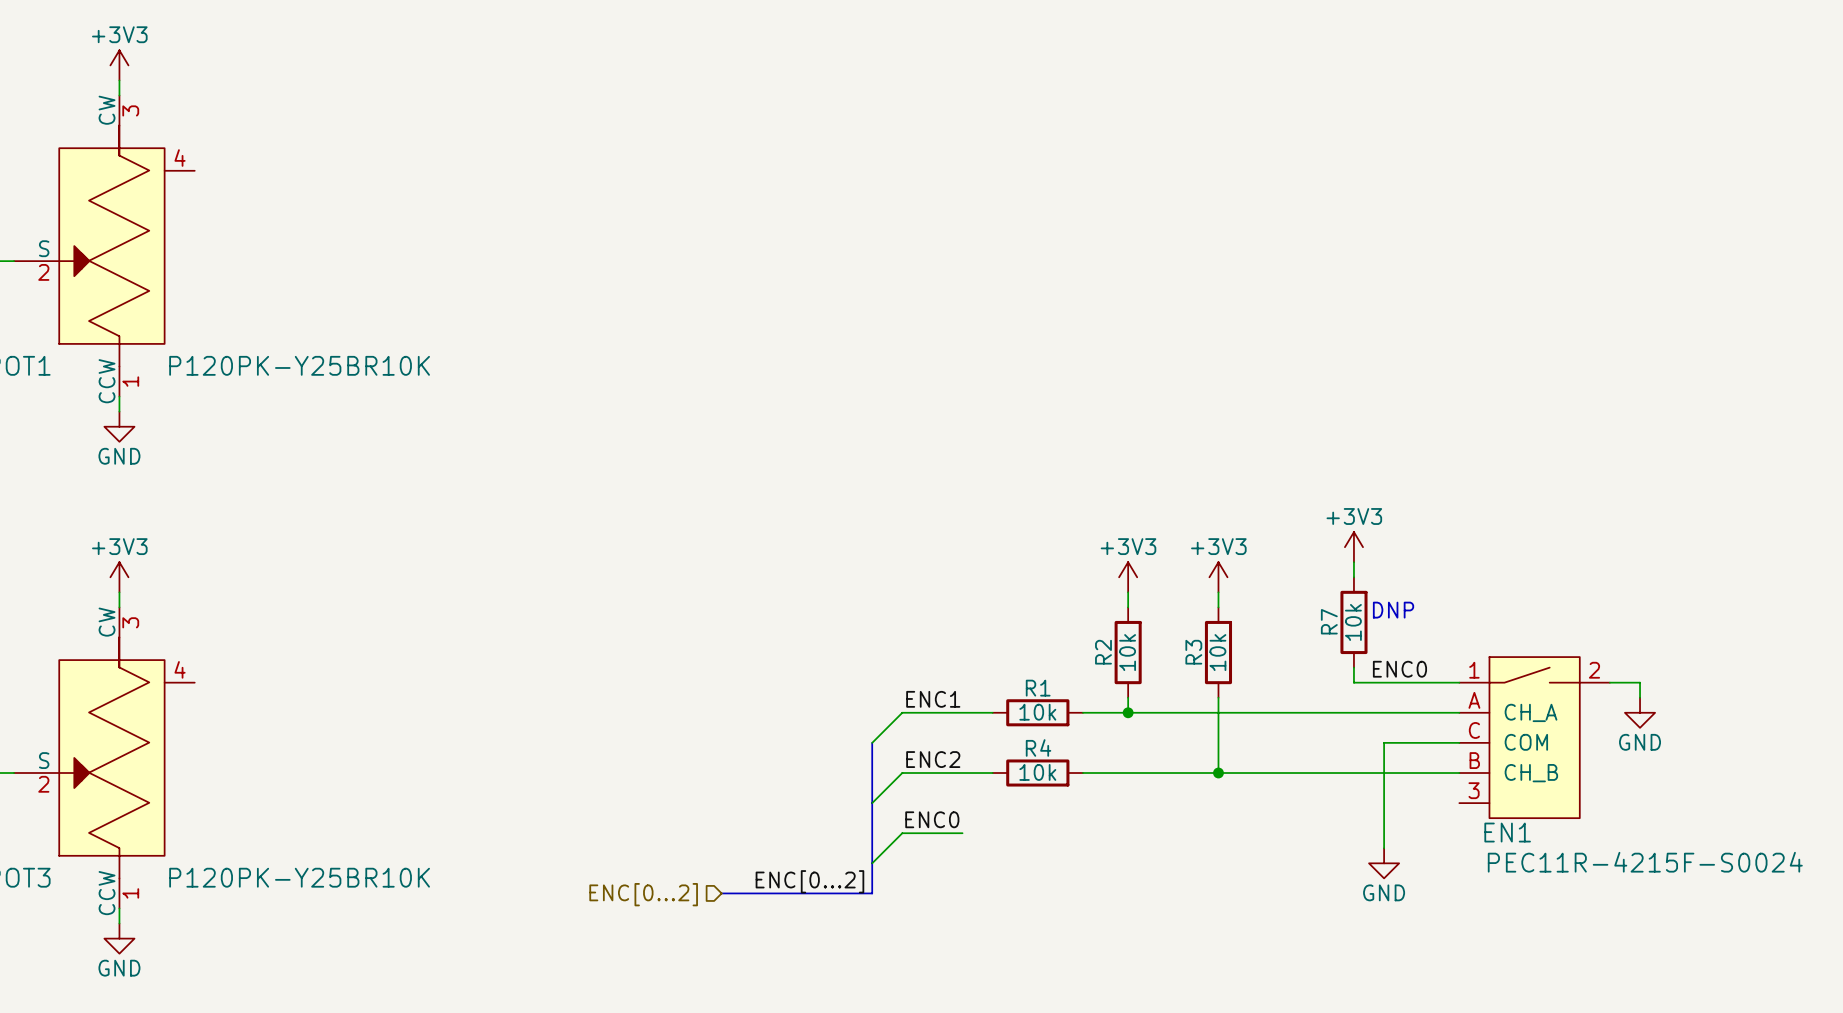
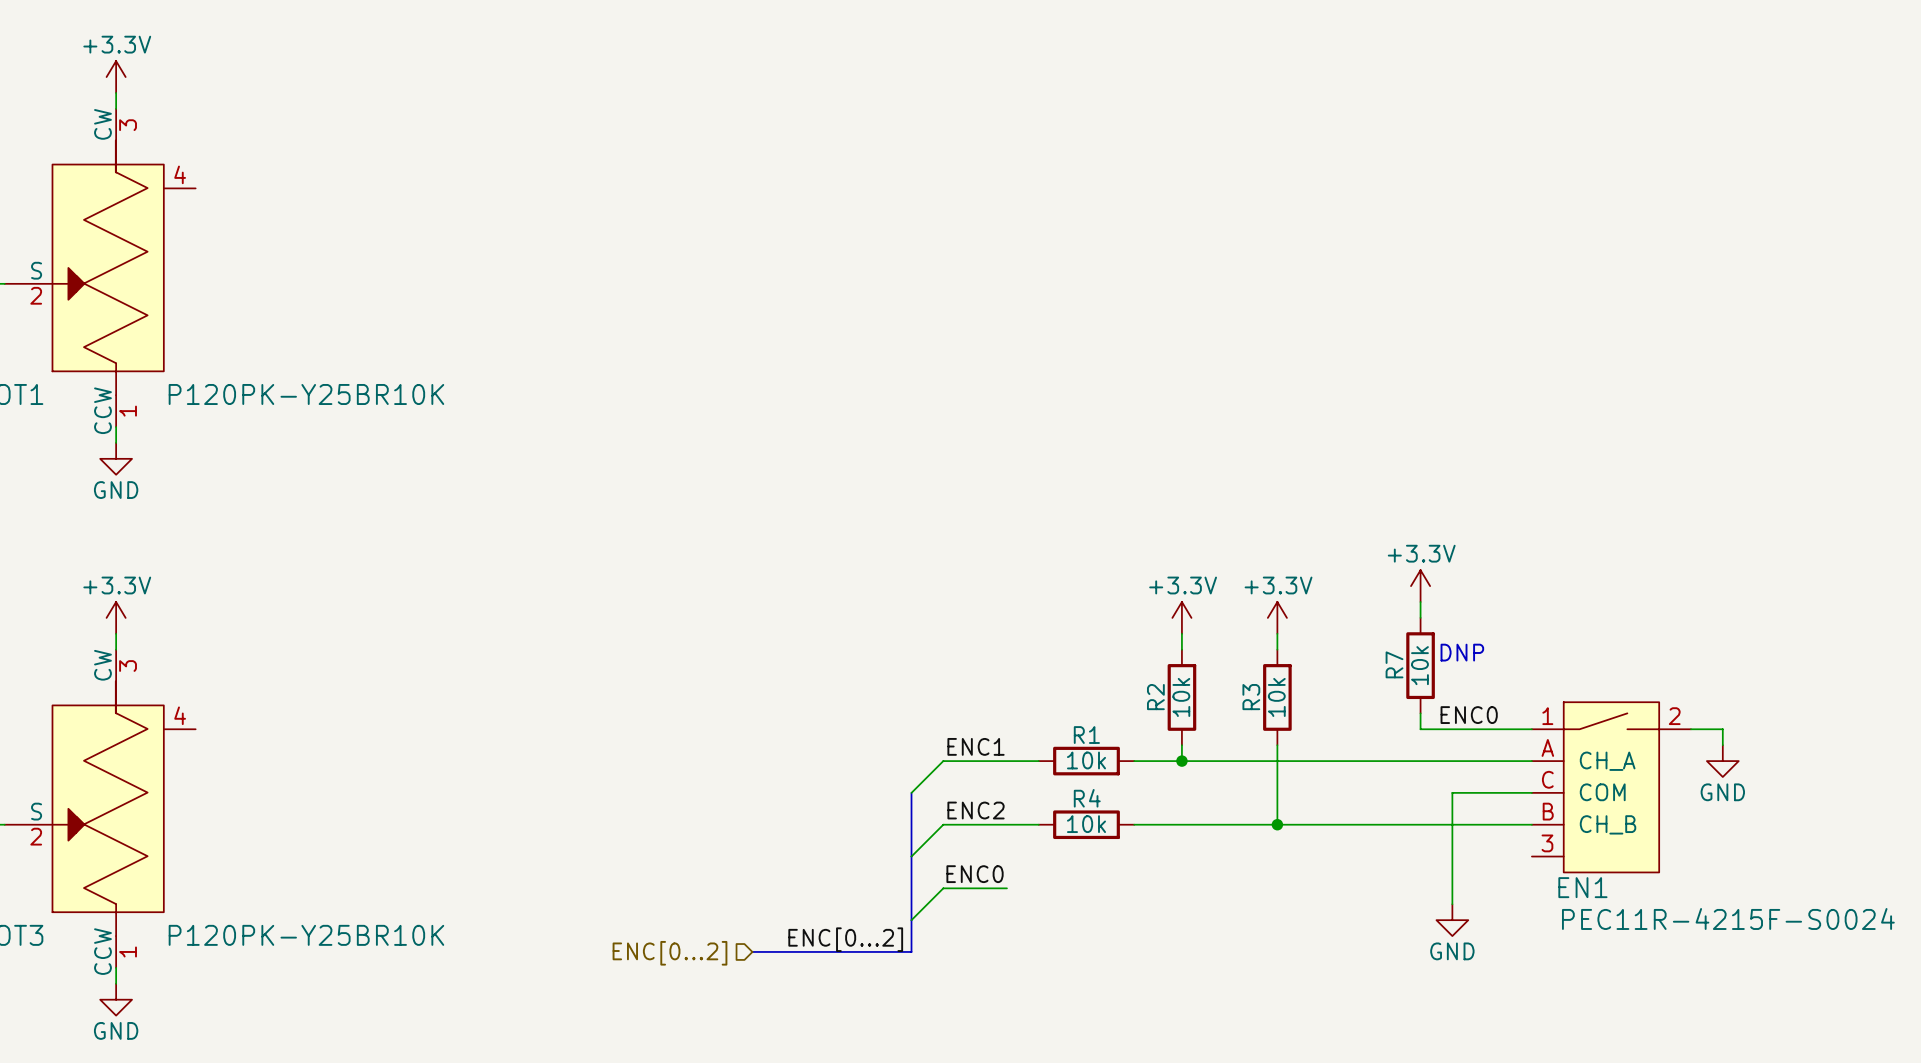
power symbol: +3V3 (119, 65) -> +3.3V (116, 77)
power symbol: +3V3 (1353, 547) -> +3.3V (1420, 586)
power symbol: +3V3 (119, 577) -> +3.3V (116, 617)
power symbol: +3V3 (1128, 577) -> +3.3V (1181, 617)
power symbol: +3V3 (1218, 577) -> +3.3V (1277, 617)

